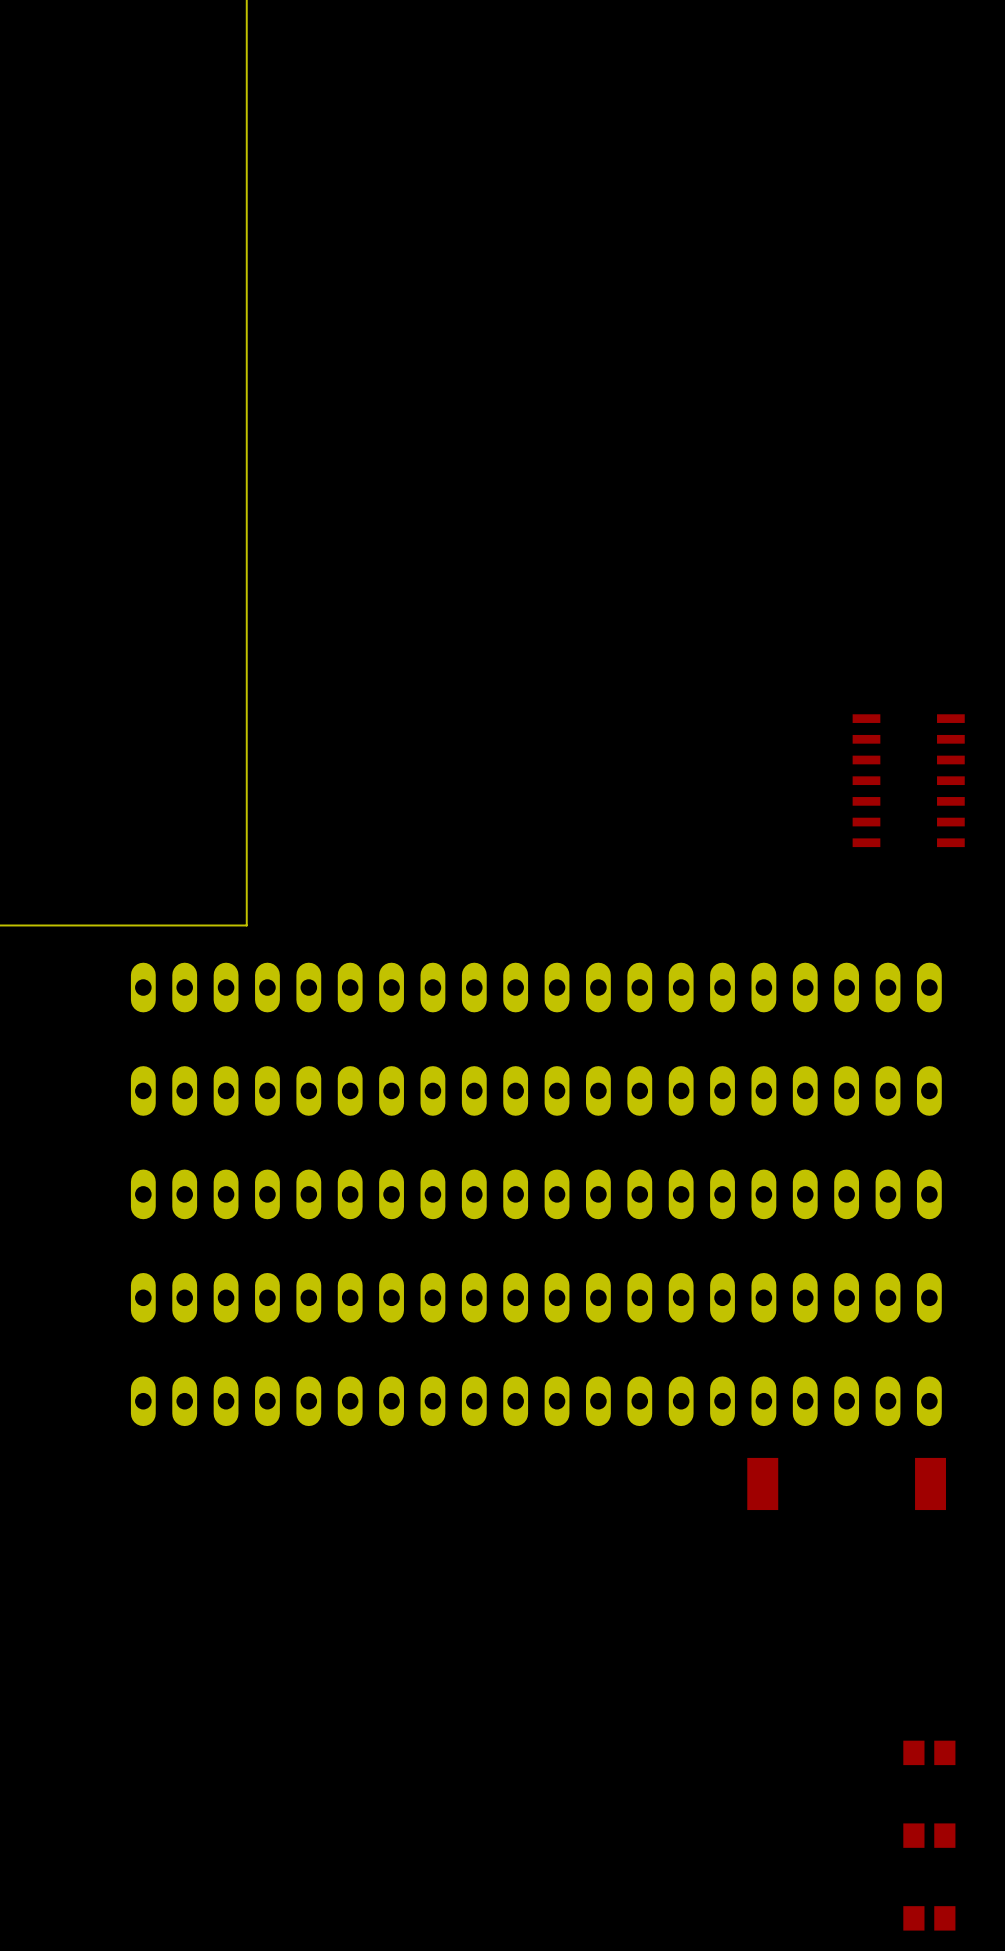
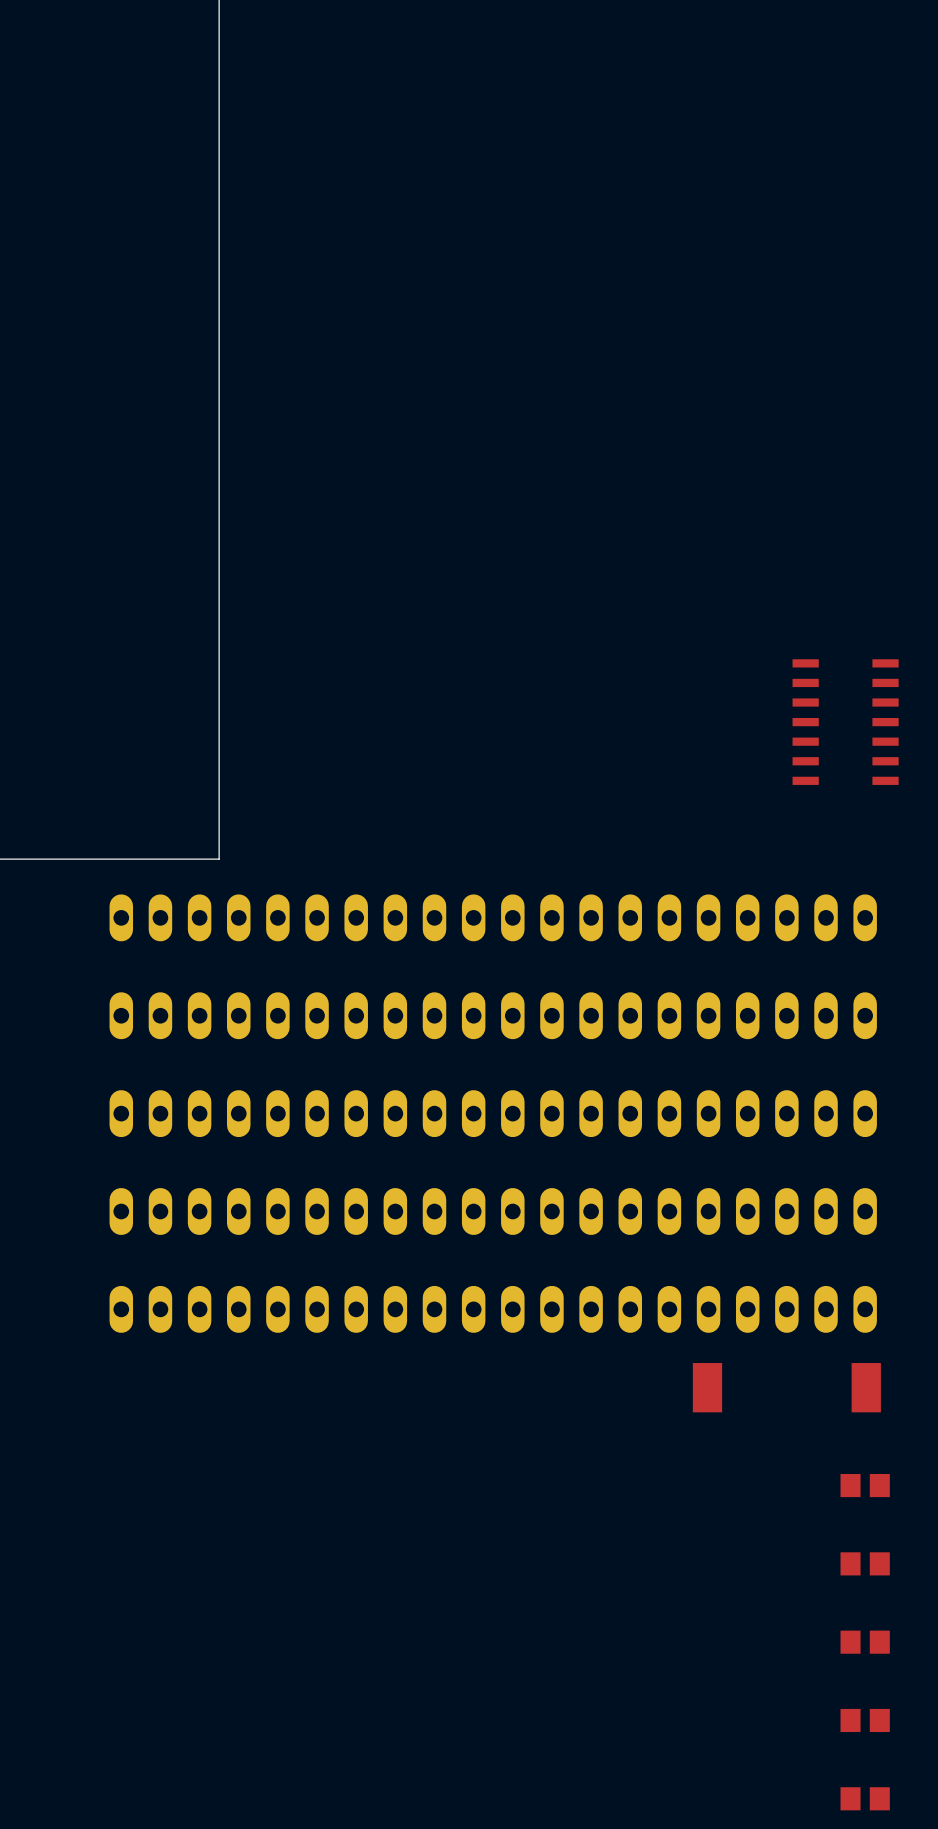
part: none -> (865, 1485)
part: none -> (865, 1563)

